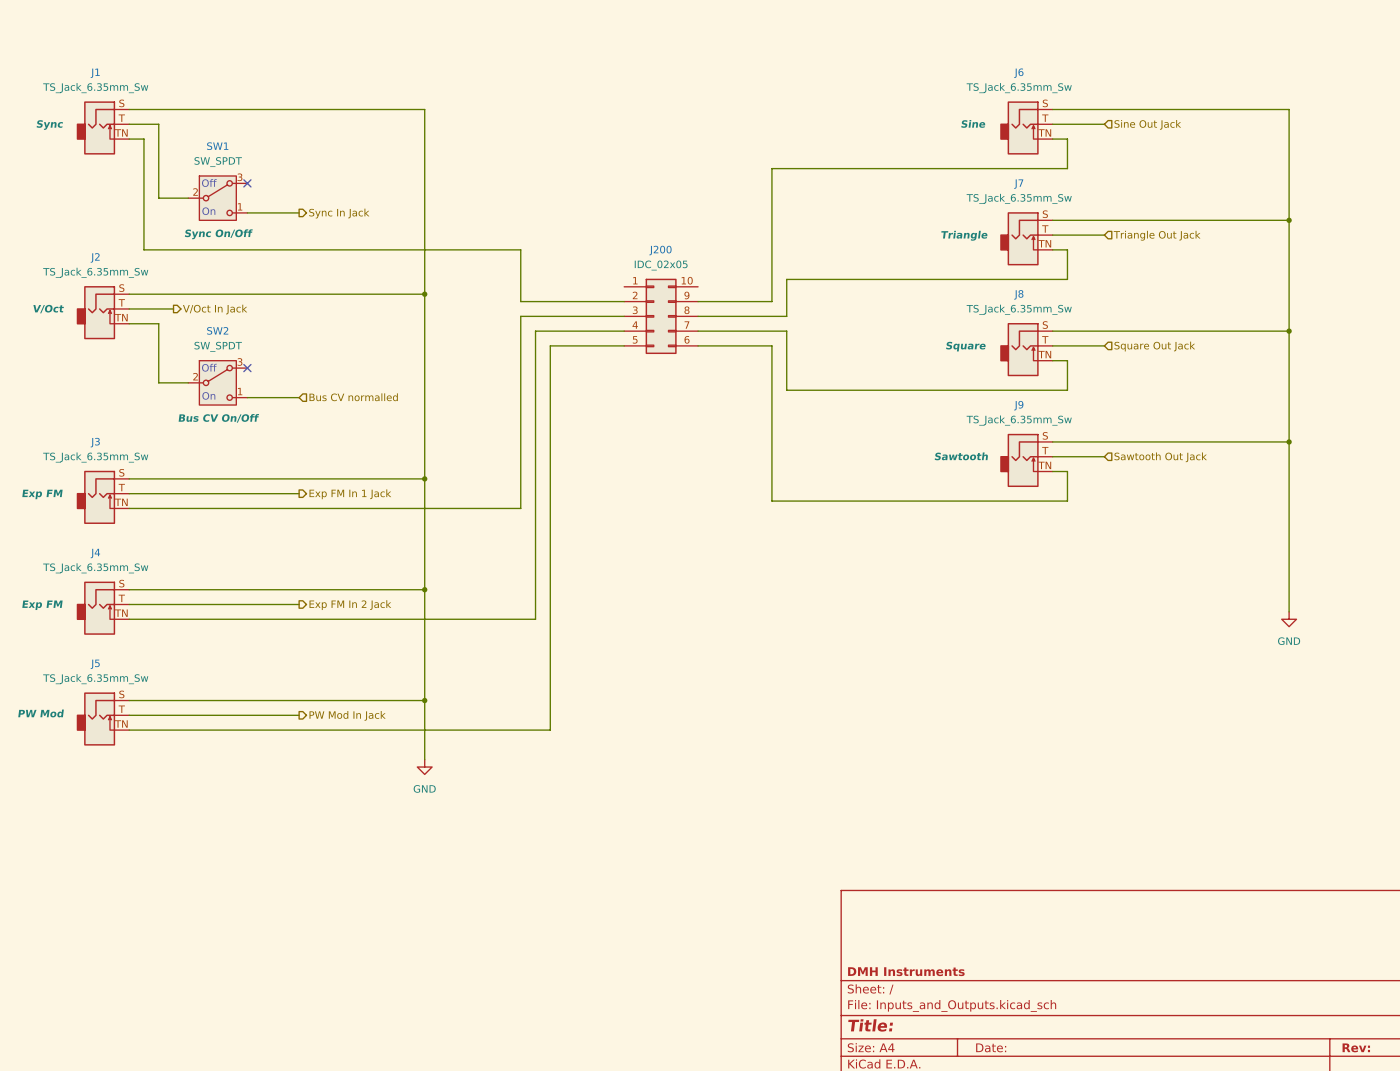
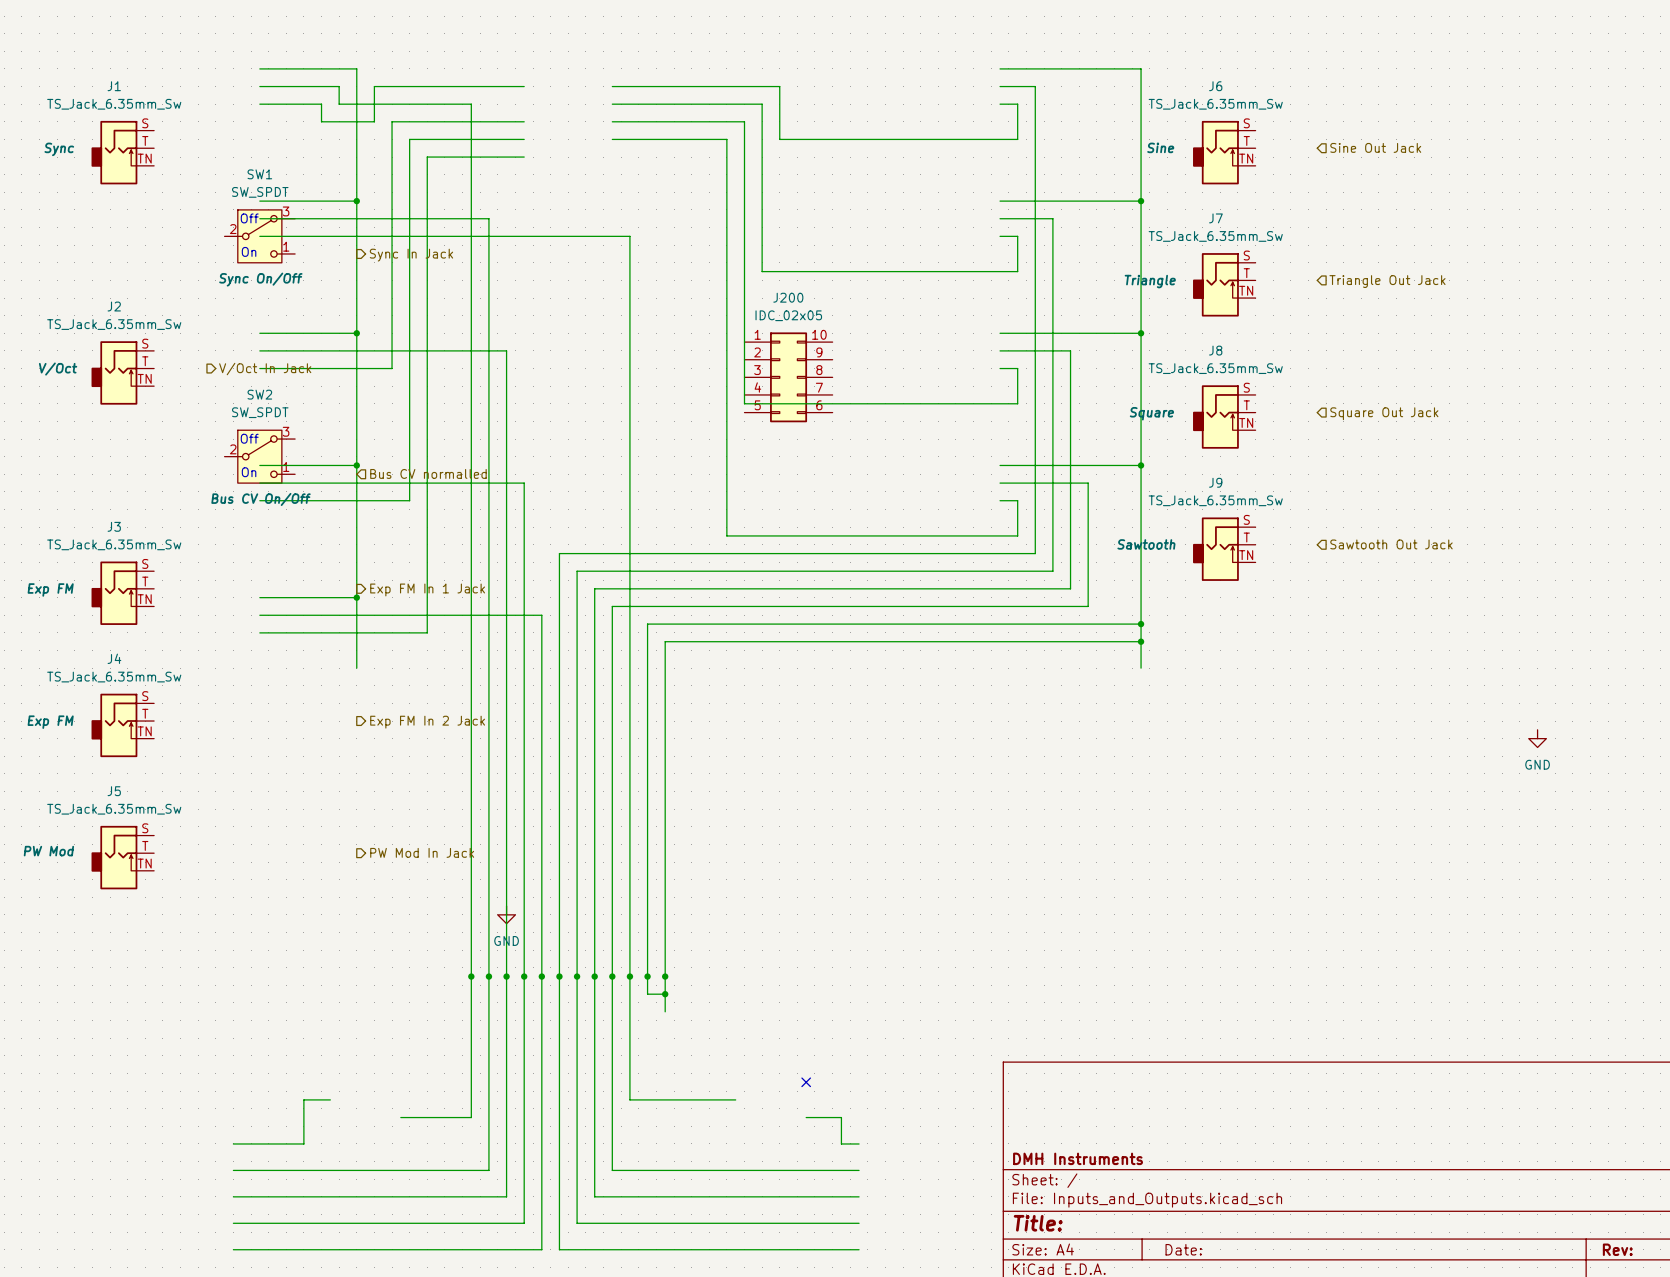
wire: none -> (259, 68) (356, 68) (356, 668)
wire: none -> (1000, 68) (1141, 68) (1141, 668)
wire: none -> (259, 86) (339, 86) (339, 104) (471, 104) (471, 1117) (400, 1117)
wire: none -> (524, 86) (374, 86) (374, 121) (321, 121) (321, 104) (259, 104)
wire: none -> (612, 86) (779, 86) (779, 139) (1017, 139) (1017, 104) (1000, 104)
wire: none -> (1000, 86) (1035, 86) (1035, 553) (559, 553) (559, 1249) (859, 1249)
wire: none -> (612, 104) (762, 104) (762, 271) (1017, 271) (1017, 236) (1000, 236)
wire: none -> (524, 121) (392, 121) (392, 368) (259, 368)
wire: none -> (612, 121) (744, 121) (744, 403) (1017, 403) (1017, 368) (1000, 368)
wire: (129, 109) (424, 109) (424, 294) -> none
wire: (1052, 109) (1289, 109) (1289, 611) -> none
wire: none -> (524, 139) (409, 139) (409, 500) (259, 500)
wire: none -> (612, 139) (726, 139) (726, 535) (1017, 535) (1017, 500) (1000, 500)
wire: (129, 124) (158, 124) (158, 198) (188, 198) -> none
wire: (1052, 124) (1104, 124) -> none
wire: none -> (524, 157) (427, 157) (427, 632) (259, 632)
wire: (129, 139) (143, 139) (143, 249) (520, 249) (520, 301) (624, 301) -> none
wire: (1052, 139) (1067, 139) (1067, 168) (956, 168) -> none
wire: none -> (259, 201) (356, 201)
junction: none -> (356, 201)
wire: (838, 168) (771, 168) (771, 301) (698, 301) -> none
junction: none -> (1141, 201)
wire: none -> (259, 218) (488, 218) (488, 1170) (233, 1170)
no-connect mark: (247, 183) -> none
wire: none -> (1000, 218) (1052, 218) (1052, 571) (577, 571) (577, 1223) (859, 1223)
wire: none -> (259, 236) (629, 236) (629, 1099) (735, 1099)
wire: (247, 212) (299, 212) -> none
wire: (1052, 220) (1289, 220) -> none
junction: (1289, 220) -> none
wire: (1052, 235) (1104, 235) -> none
wire: (1052, 249) (1067, 249) (1067, 279) (956, 279) -> none
wire: none -> (259, 333) (356, 333)
junction: none -> (356, 333)
wire: (838, 279) (786, 279) (786, 316) (698, 316) -> none
junction: none -> (1141, 333)
wire: (129, 294) (217, 294) -> none
junction: (424, 294) -> none
wire: none -> (1000, 350) (1070, 350) (1070, 588) (594, 588) (594, 1196) (859, 1196)
wire: (129, 308) (173, 308) -> none
wire: (624, 316) (520, 316) (520, 508) -> (1000, 483) (1088, 483) (1088, 606) (621, 606)
wire: (129, 323) (158, 323) (158, 382) (188, 382) -> none
wire: (624, 331) (535, 331) (535, 619) (129, 619) -> none
wire: (698, 331) (786, 331) (786, 390) (838, 390) -> none
wire: (1052, 331) (1289, 331) -> none
junction: (1289, 331) -> none
wire: (624, 345) (550, 345) (550, 730) (129, 730) -> none
wire: (698, 345) (771, 345) (771, 501) (1067, 501) (1067, 471) (1052, 471) -> none
wire: (1052, 345) (1104, 345) -> none
wire: (1052, 360) (1067, 360) (1067, 390) (956, 390) -> none
no-connect mark: (247, 368) -> none
wire: none -> (259, 465) (356, 465)
junction: none -> (356, 465)
junction: none -> (1141, 465)
wire: (247, 397) (299, 397) -> none
wire: none -> (259, 483) (524, 483) (524, 1223) (233, 1223)
wire: (1052, 441) (1289, 441) -> none
junction: (1289, 441) -> none
wire: (1052, 456) (1104, 456) -> none
wire: (129, 478) (424, 478) -> none
junction: (424, 478) -> none
wire: (129, 493) (299, 493) -> none
wire: none -> (259, 597) (356, 597)
junction: none -> (356, 597)
wire: (129, 508) (513, 508) -> (859, 1170) (612, 1170) (612, 606)
wire: none -> (259, 615) (541, 615) (541, 1249) (233, 1249)
wire: none -> (1141, 624) (647, 624) (647, 994) (665, 994)
junction: none -> (1141, 624)
wire: none -> (1141, 641) (665, 641) (665, 1011)
junction: none -> (1141, 641)
wire: (129, 589) (424, 589) -> none
junction: (424, 589) -> none
wire: (129, 604) (299, 604) -> none
wire: (129, 700) (424, 700) -> none
junction: (424, 700) -> none
wire: (129, 715) (299, 715) -> none
wire: none -> (506, 906) (506, 1196) (233, 1196)
junction: none -> (471, 976)
junction: none -> (488, 976)
junction: none -> (506, 976)
junction: none -> (524, 976)
junction: none -> (541, 976)
junction: none -> (559, 976)
junction: none -> (577, 976)
junction: none -> (594, 976)
junction: none -> (612, 976)
junction: none -> (629, 976)
junction: none -> (647, 976)
junction: none -> (665, 976)
junction: none -> (665, 994)
no-connect mark: none -> (806, 1082)
wire: none -> (330, 1099) (303, 1099) (303, 1143) (233, 1143)
wire: none -> (806, 1117) (841, 1117) (841, 1143) (859, 1143)

